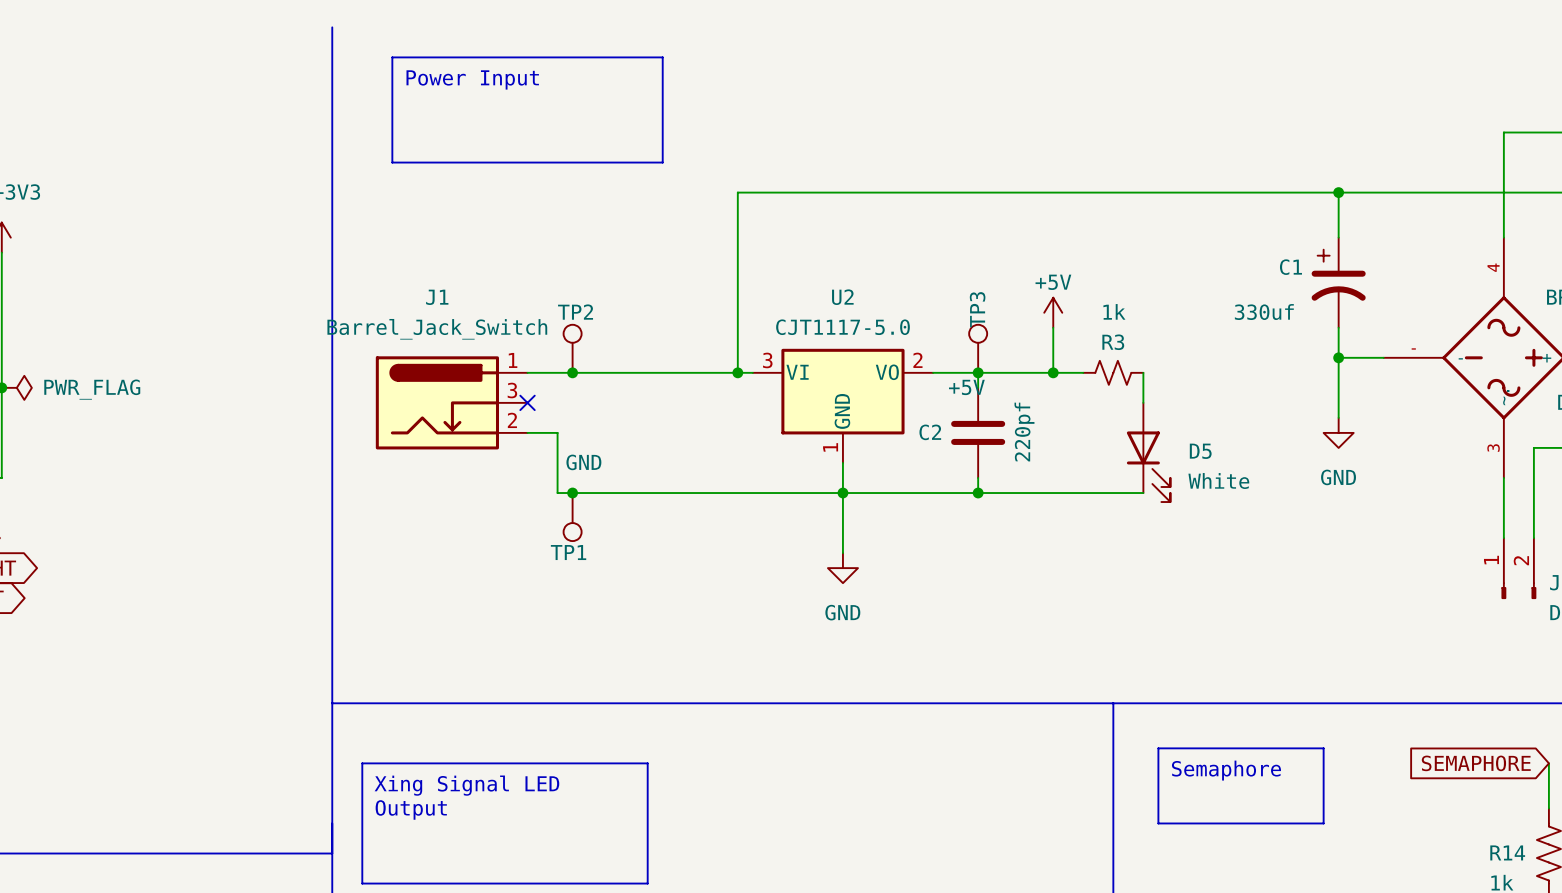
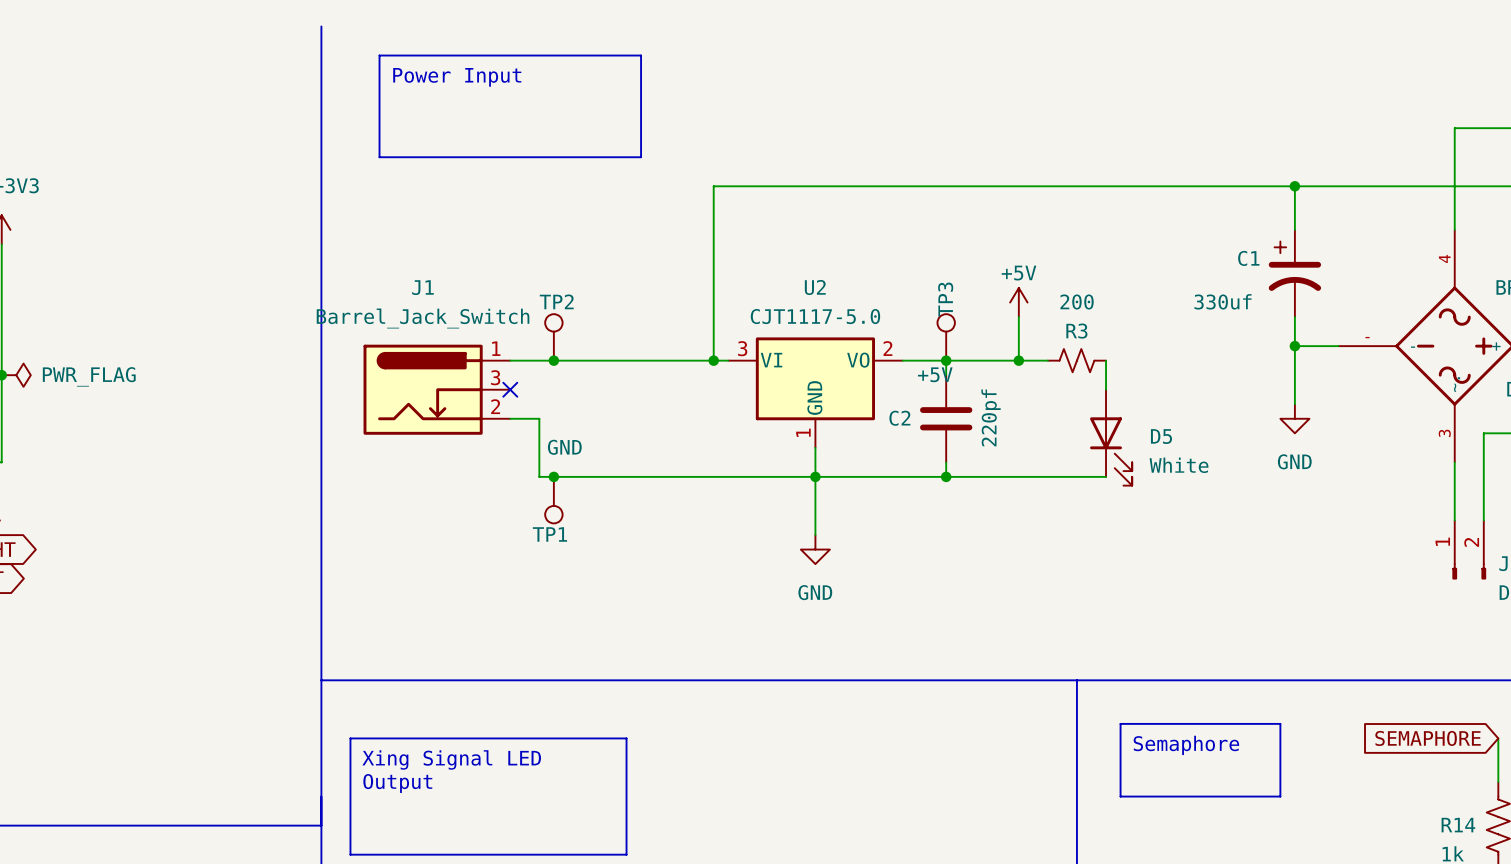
R3 value: 1k (1114, 311) -> 200 (1077, 302)

